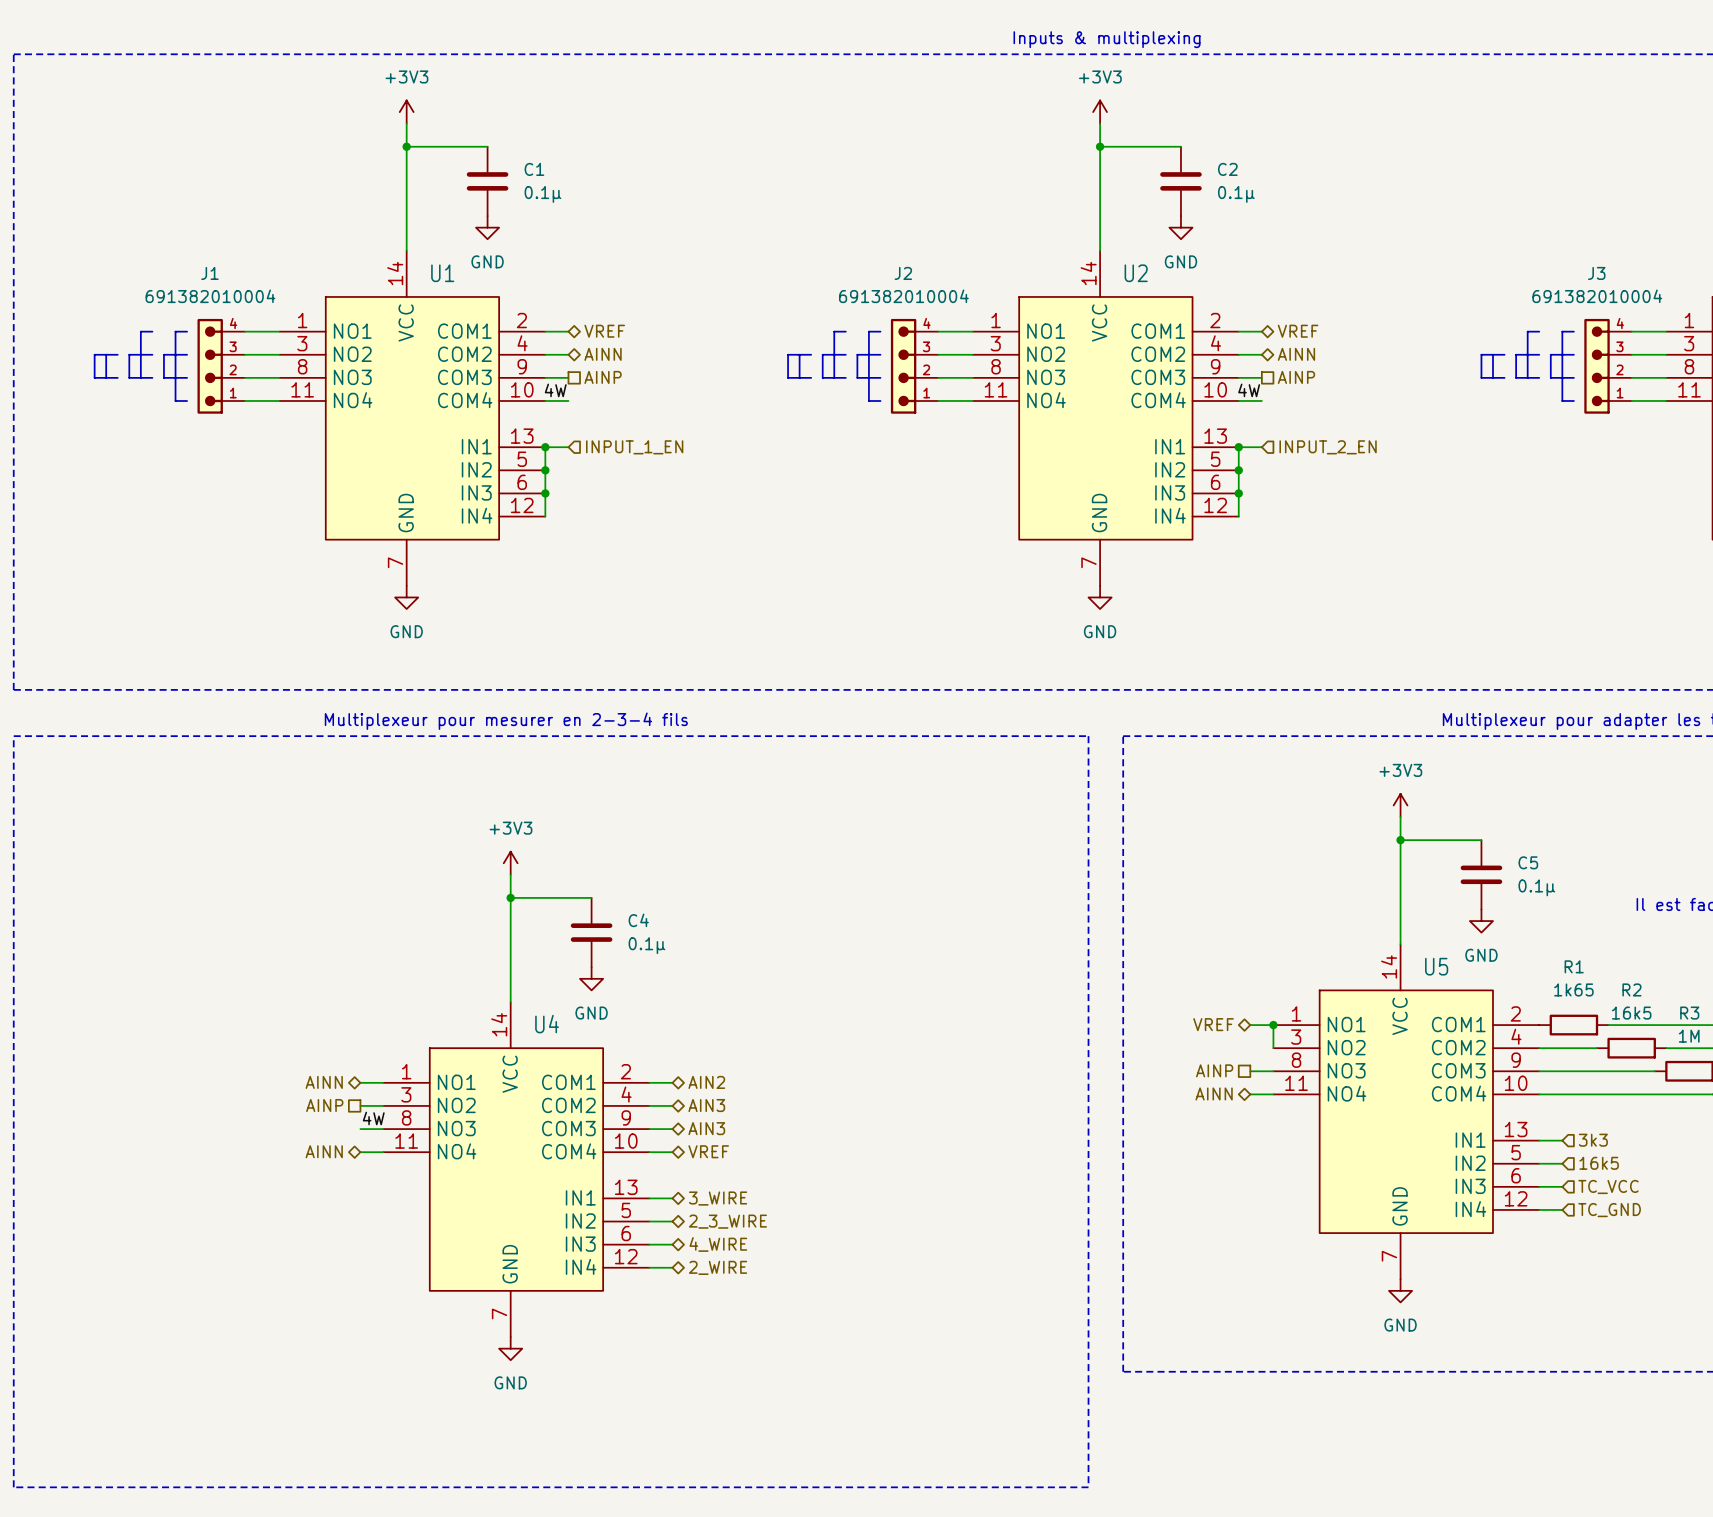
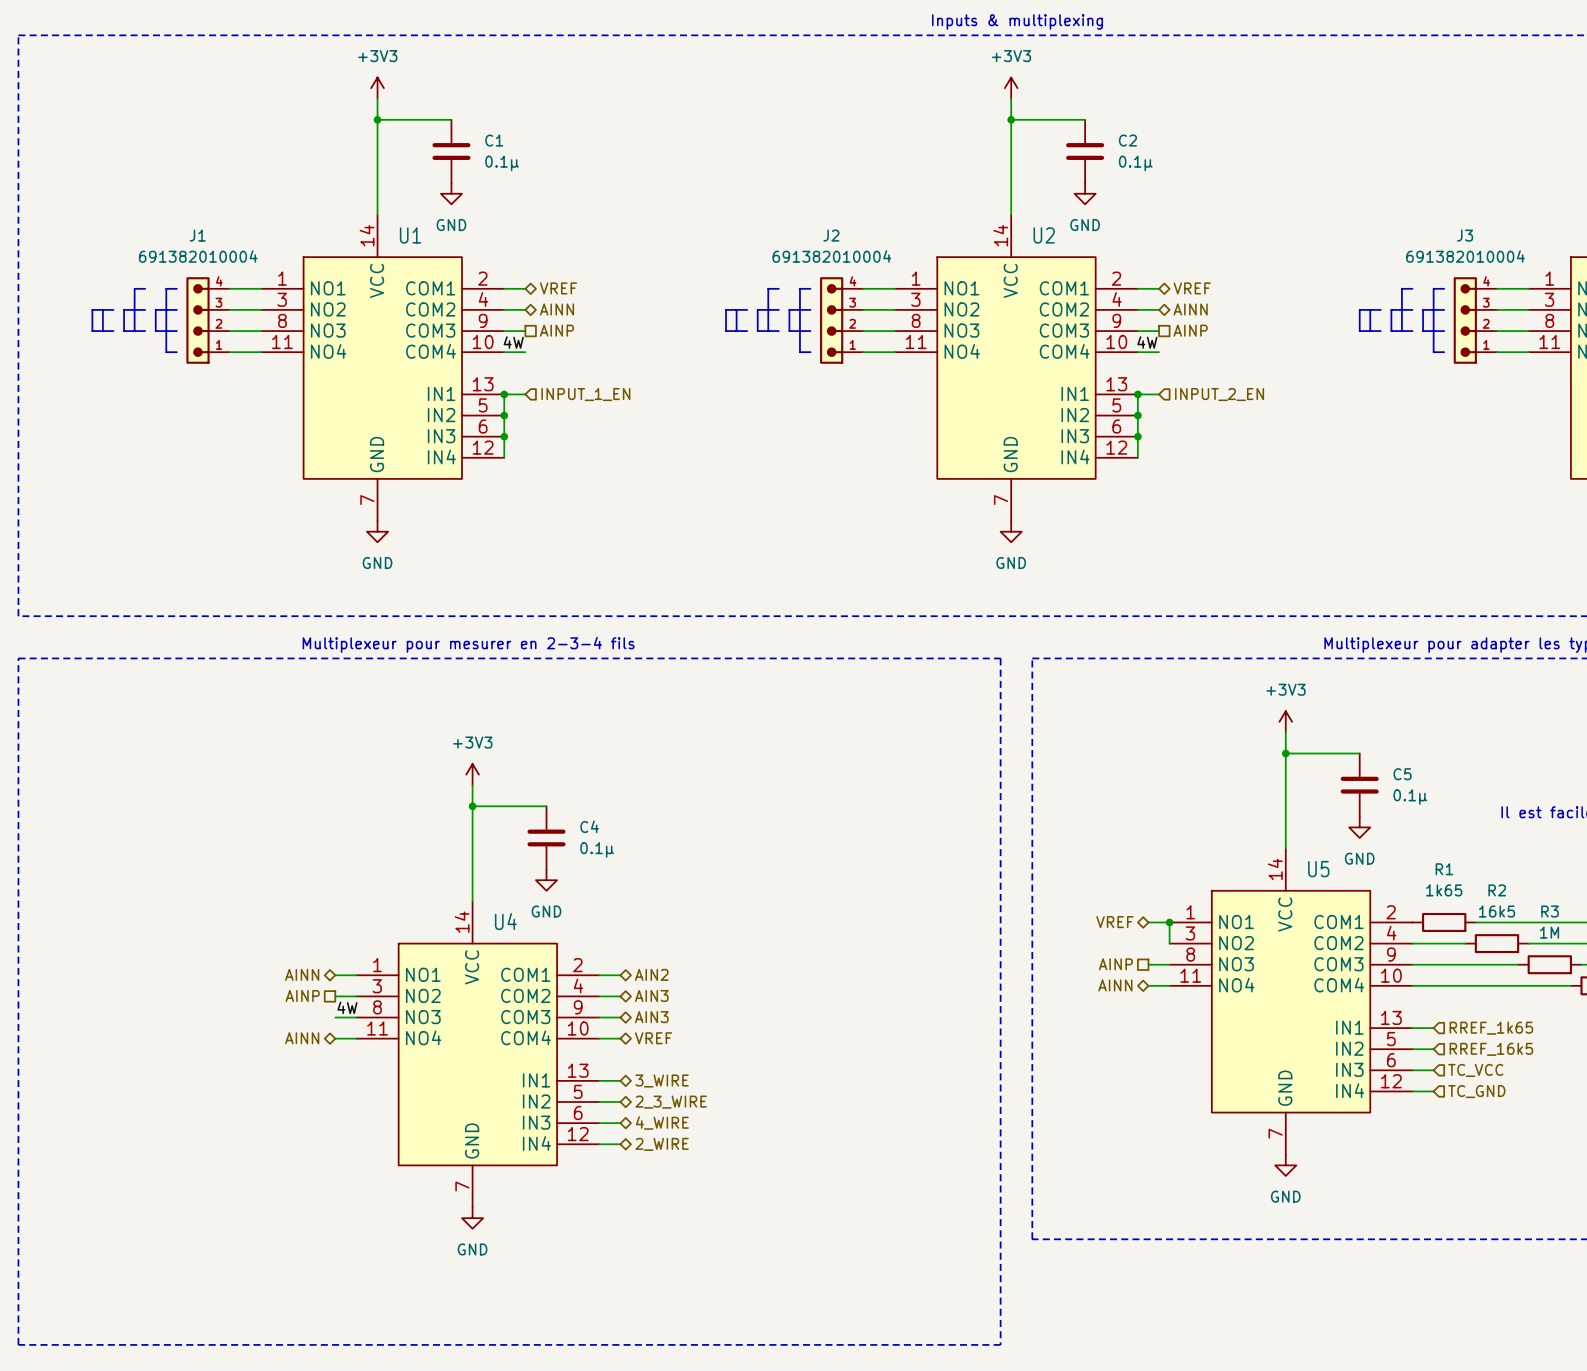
hierarchical label: 3k3 (1593, 1140) -> RREF_1k65 (1491, 1028)
hierarchical label: 16k5 (1599, 1163) -> RREF_16k5 (1491, 1049)

